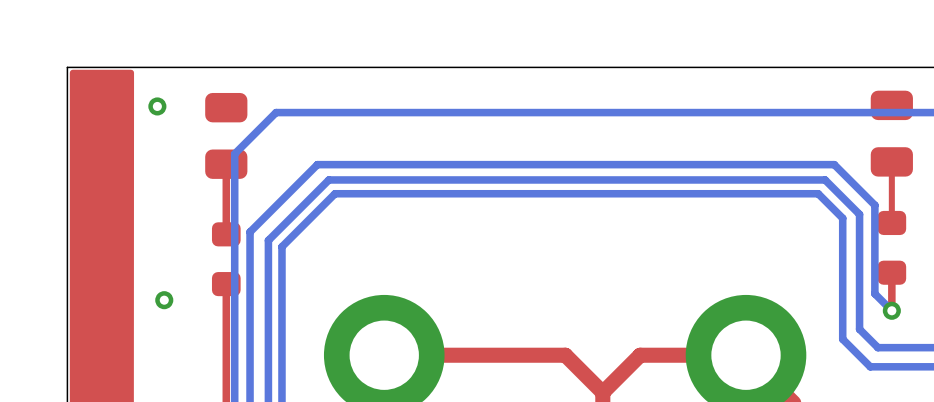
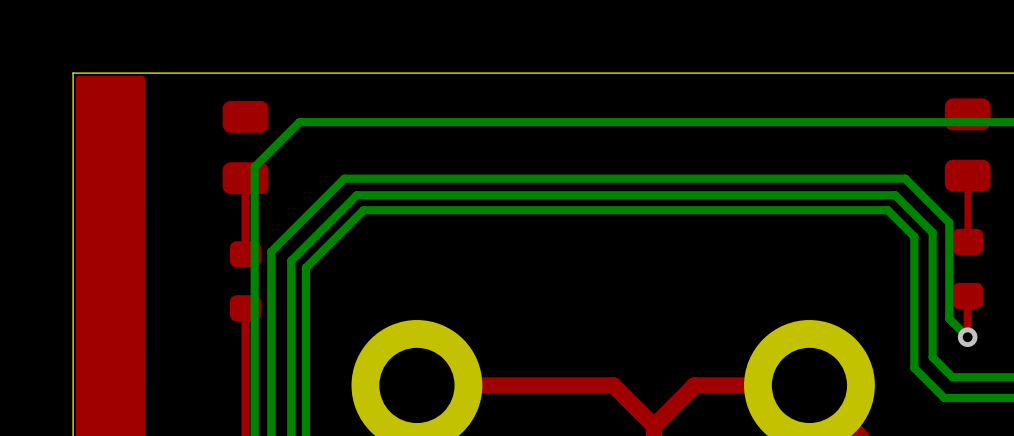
via: (157, 106) -> none
via: (164, 300) -> none

